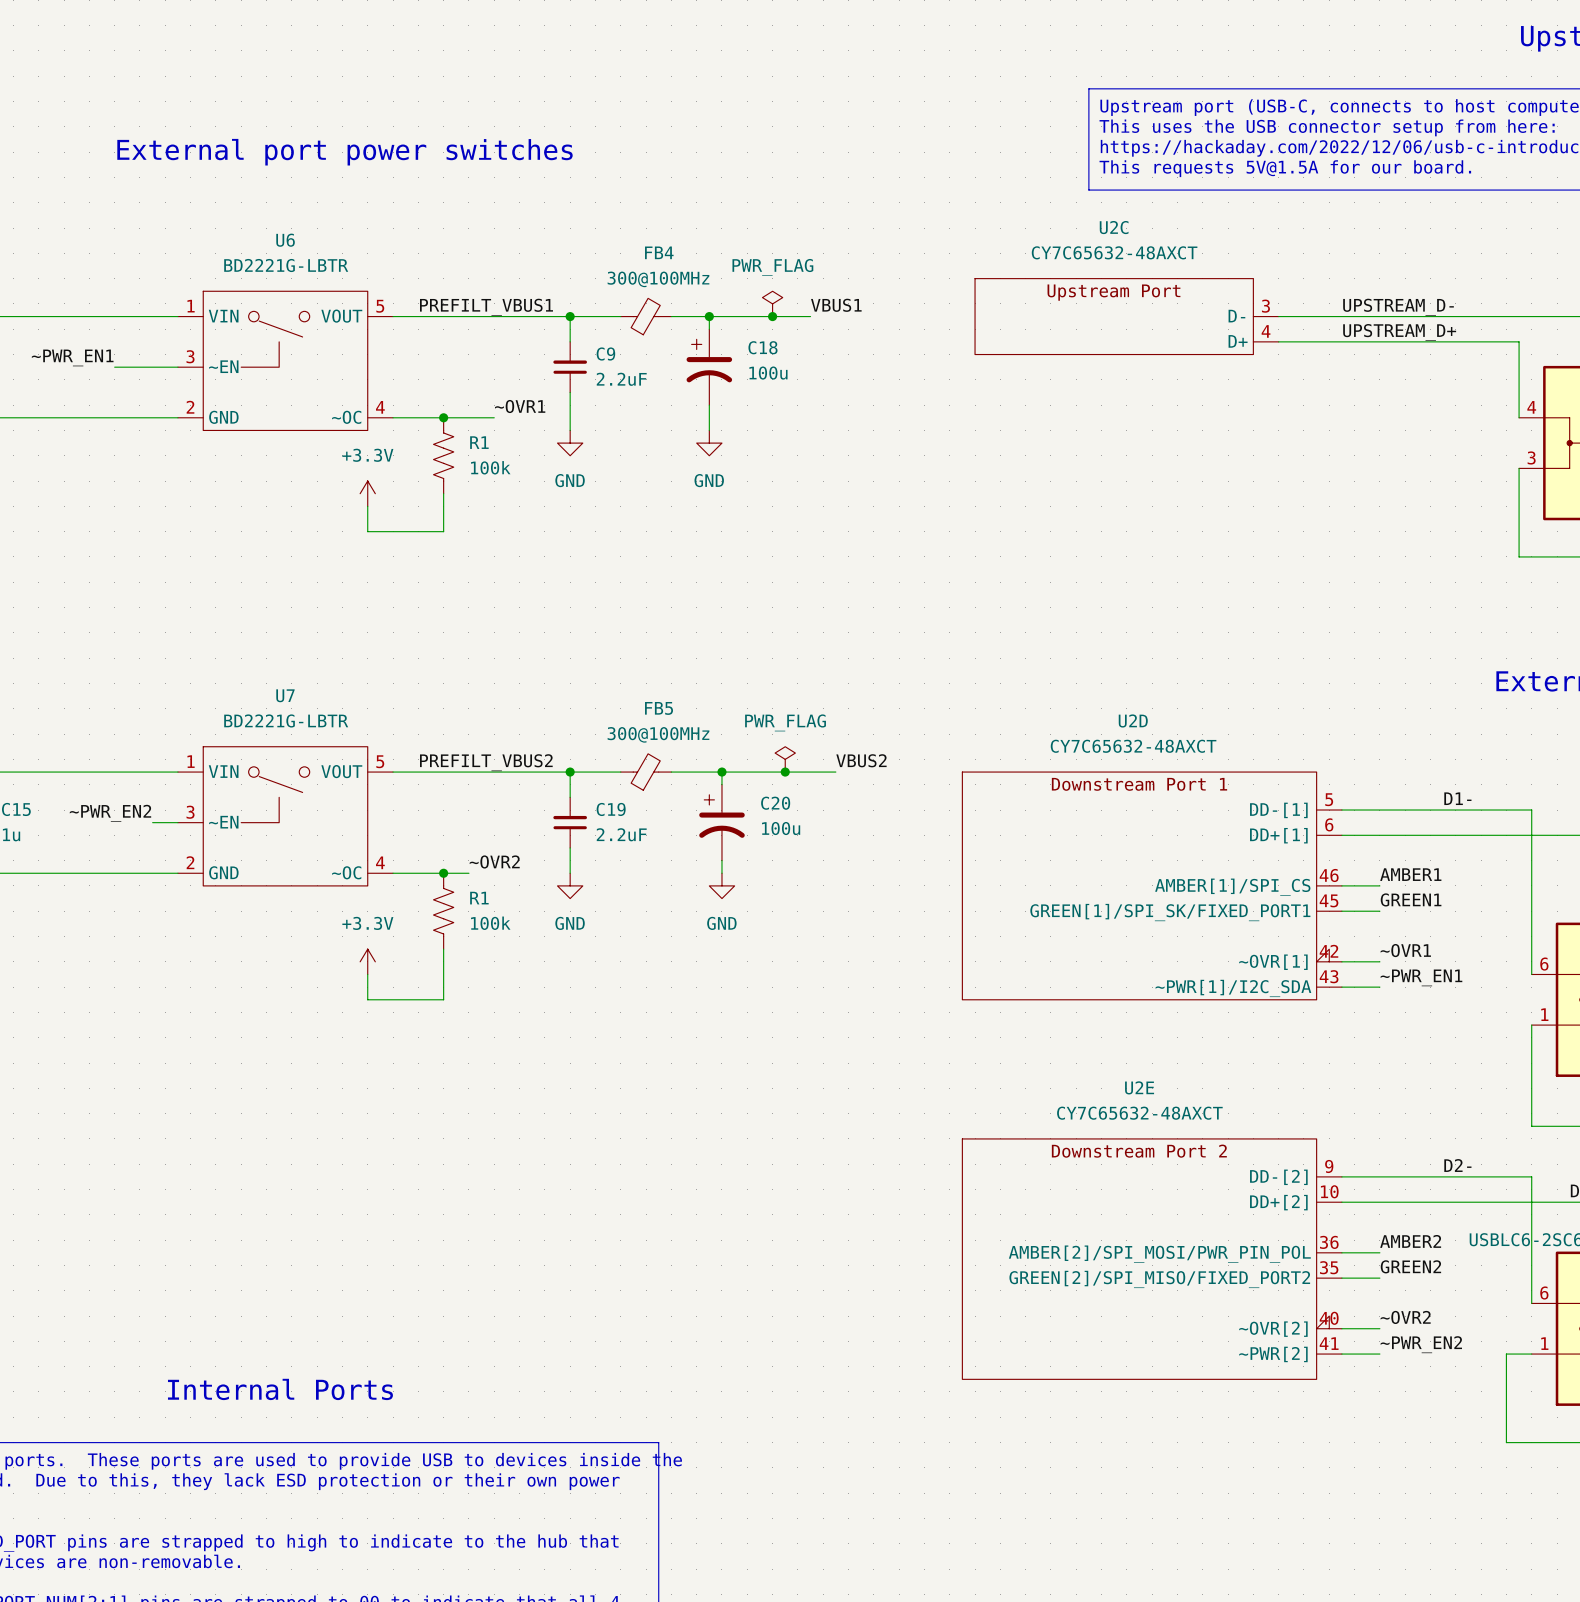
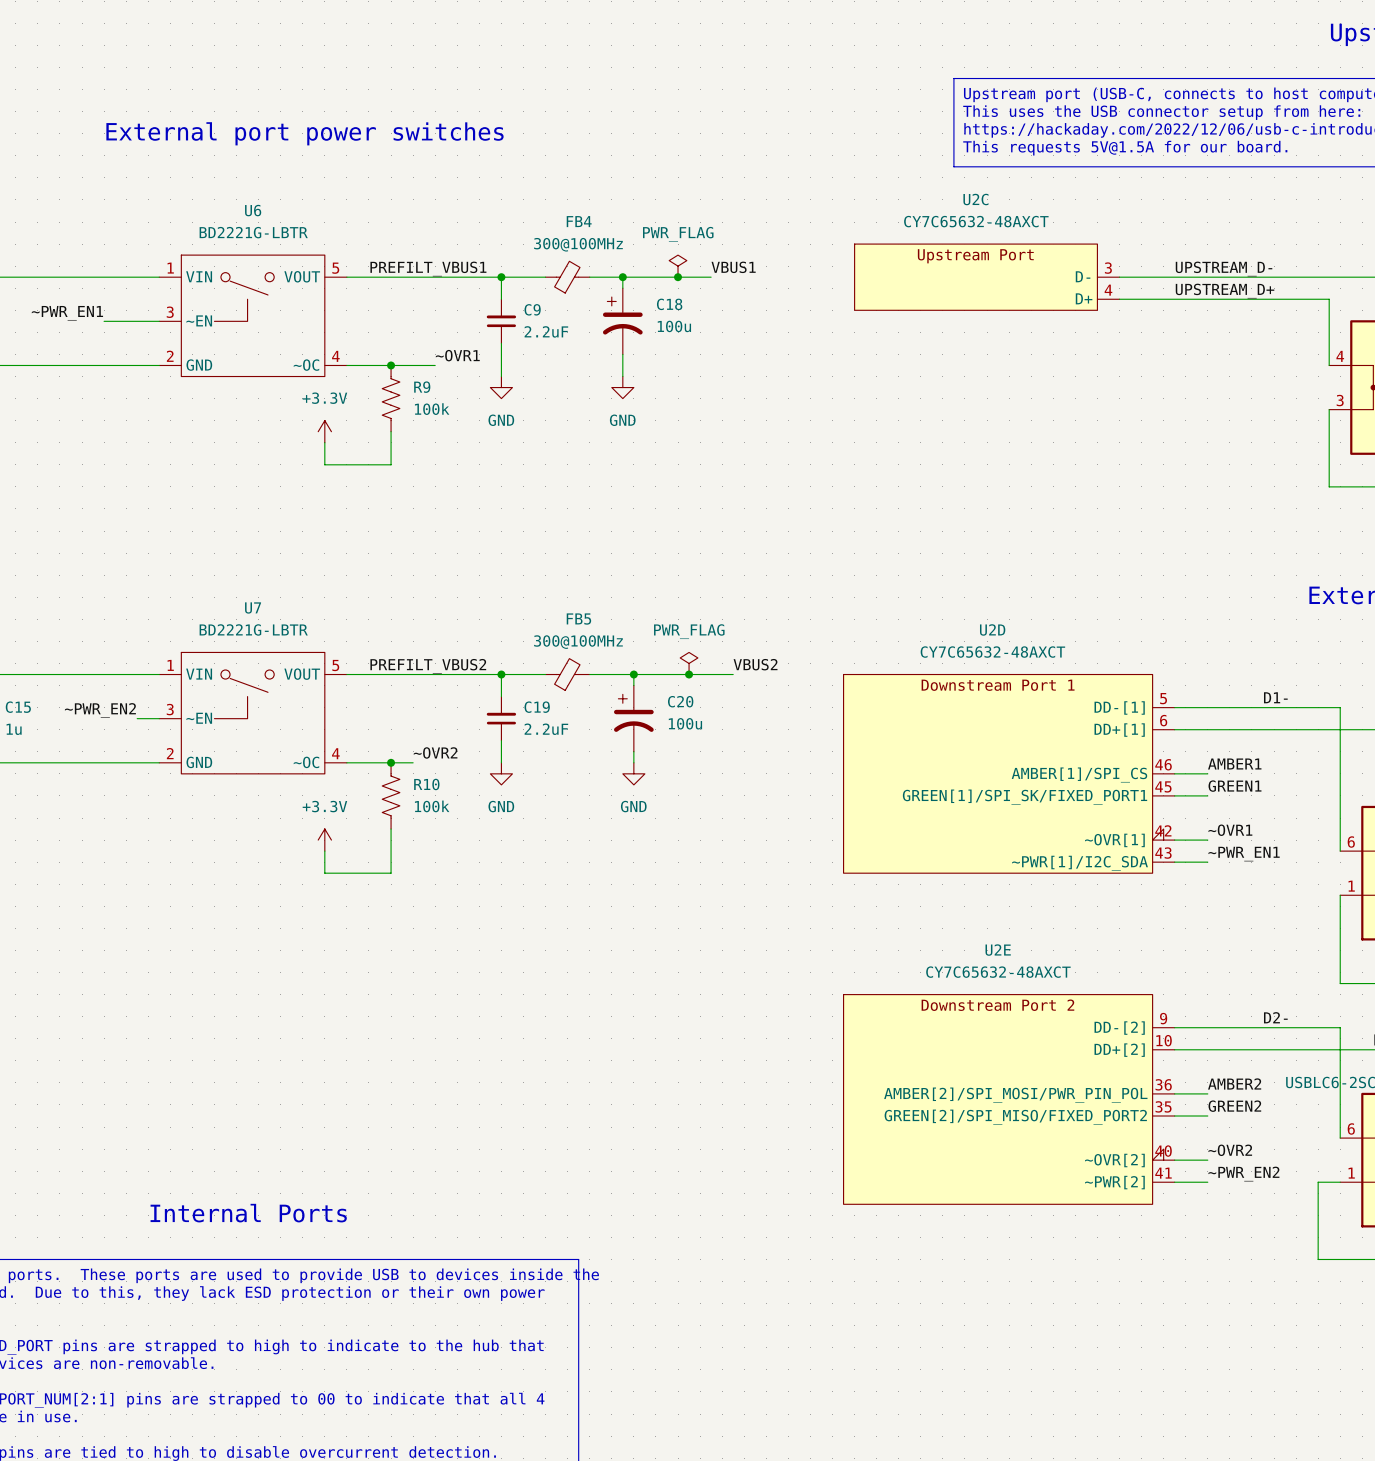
U2C symbol: [975, 278, 1279, 355] -> [854, 244, 1120, 311]
R1 name: R1 (479, 442) -> R9 (422, 387)
U2D symbol: [962, 772, 1342, 1000] -> [843, 674, 1175, 874]
R1 name: R1 (479, 898) -> R10 (426, 784)
U2E symbol: [962, 1138, 1342, 1380] -> [843, 994, 1175, 1205]

